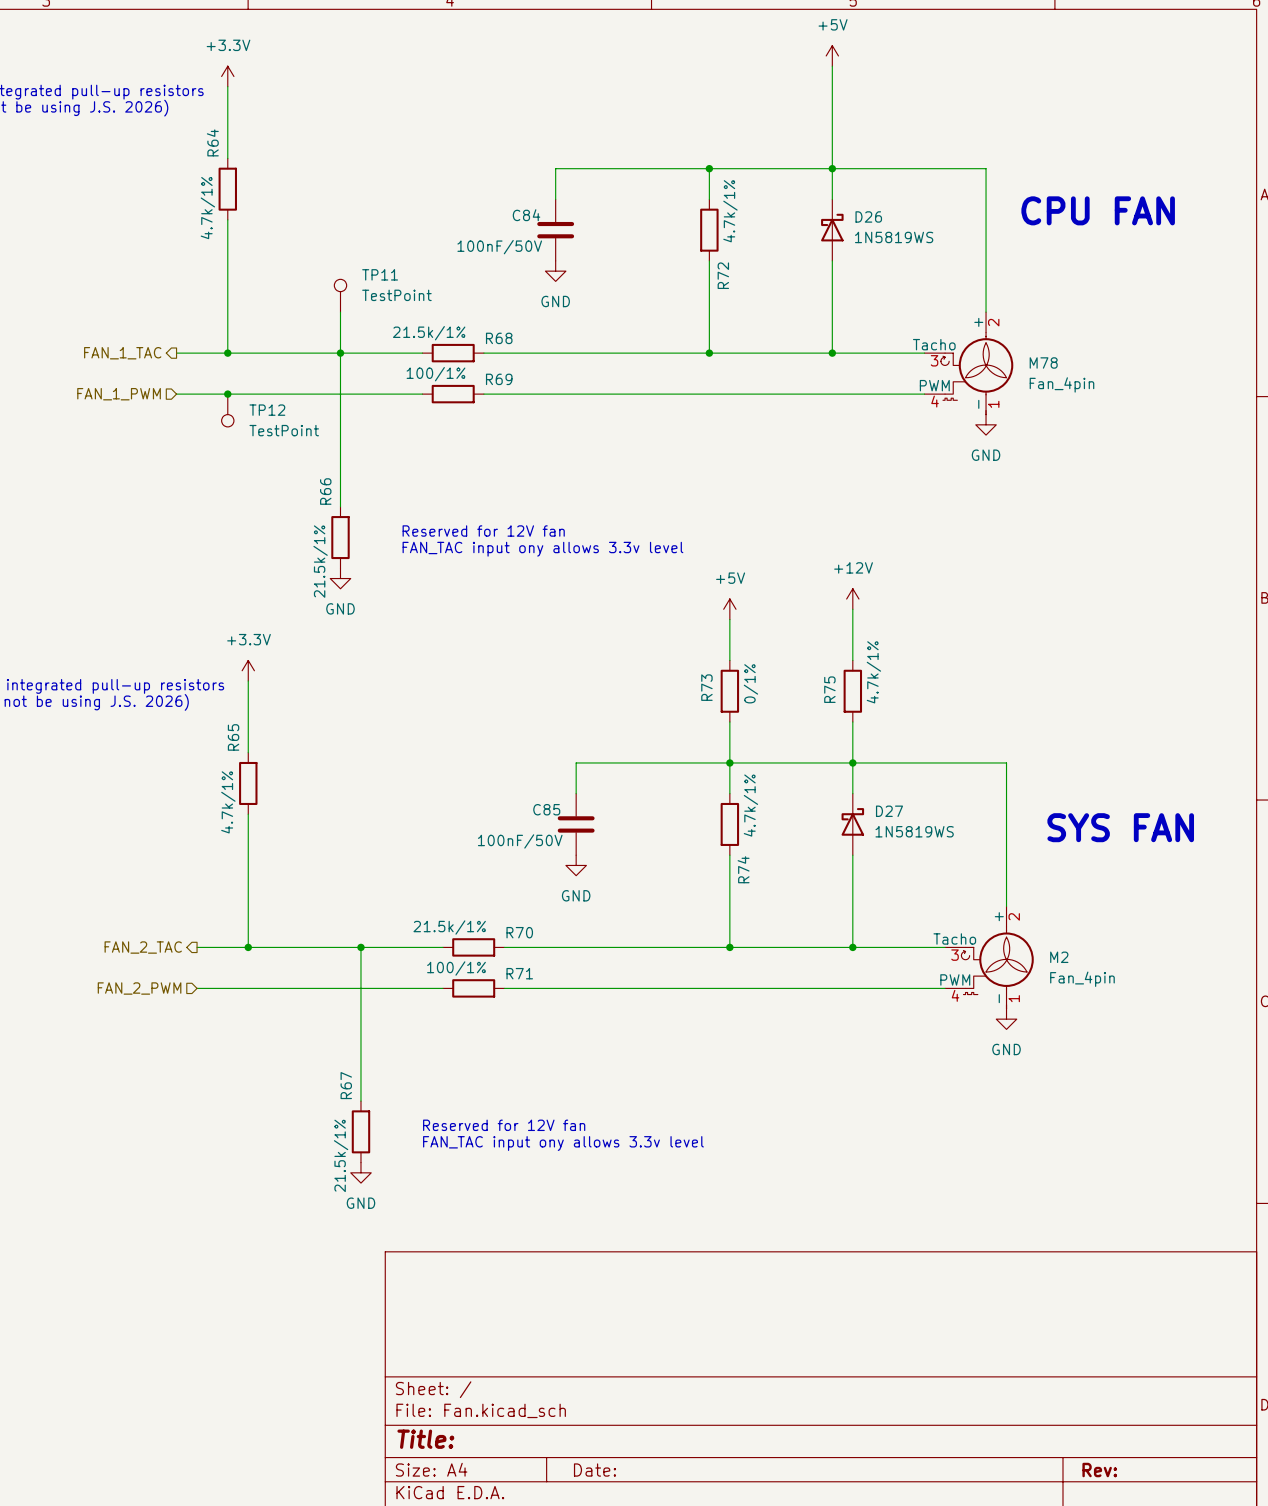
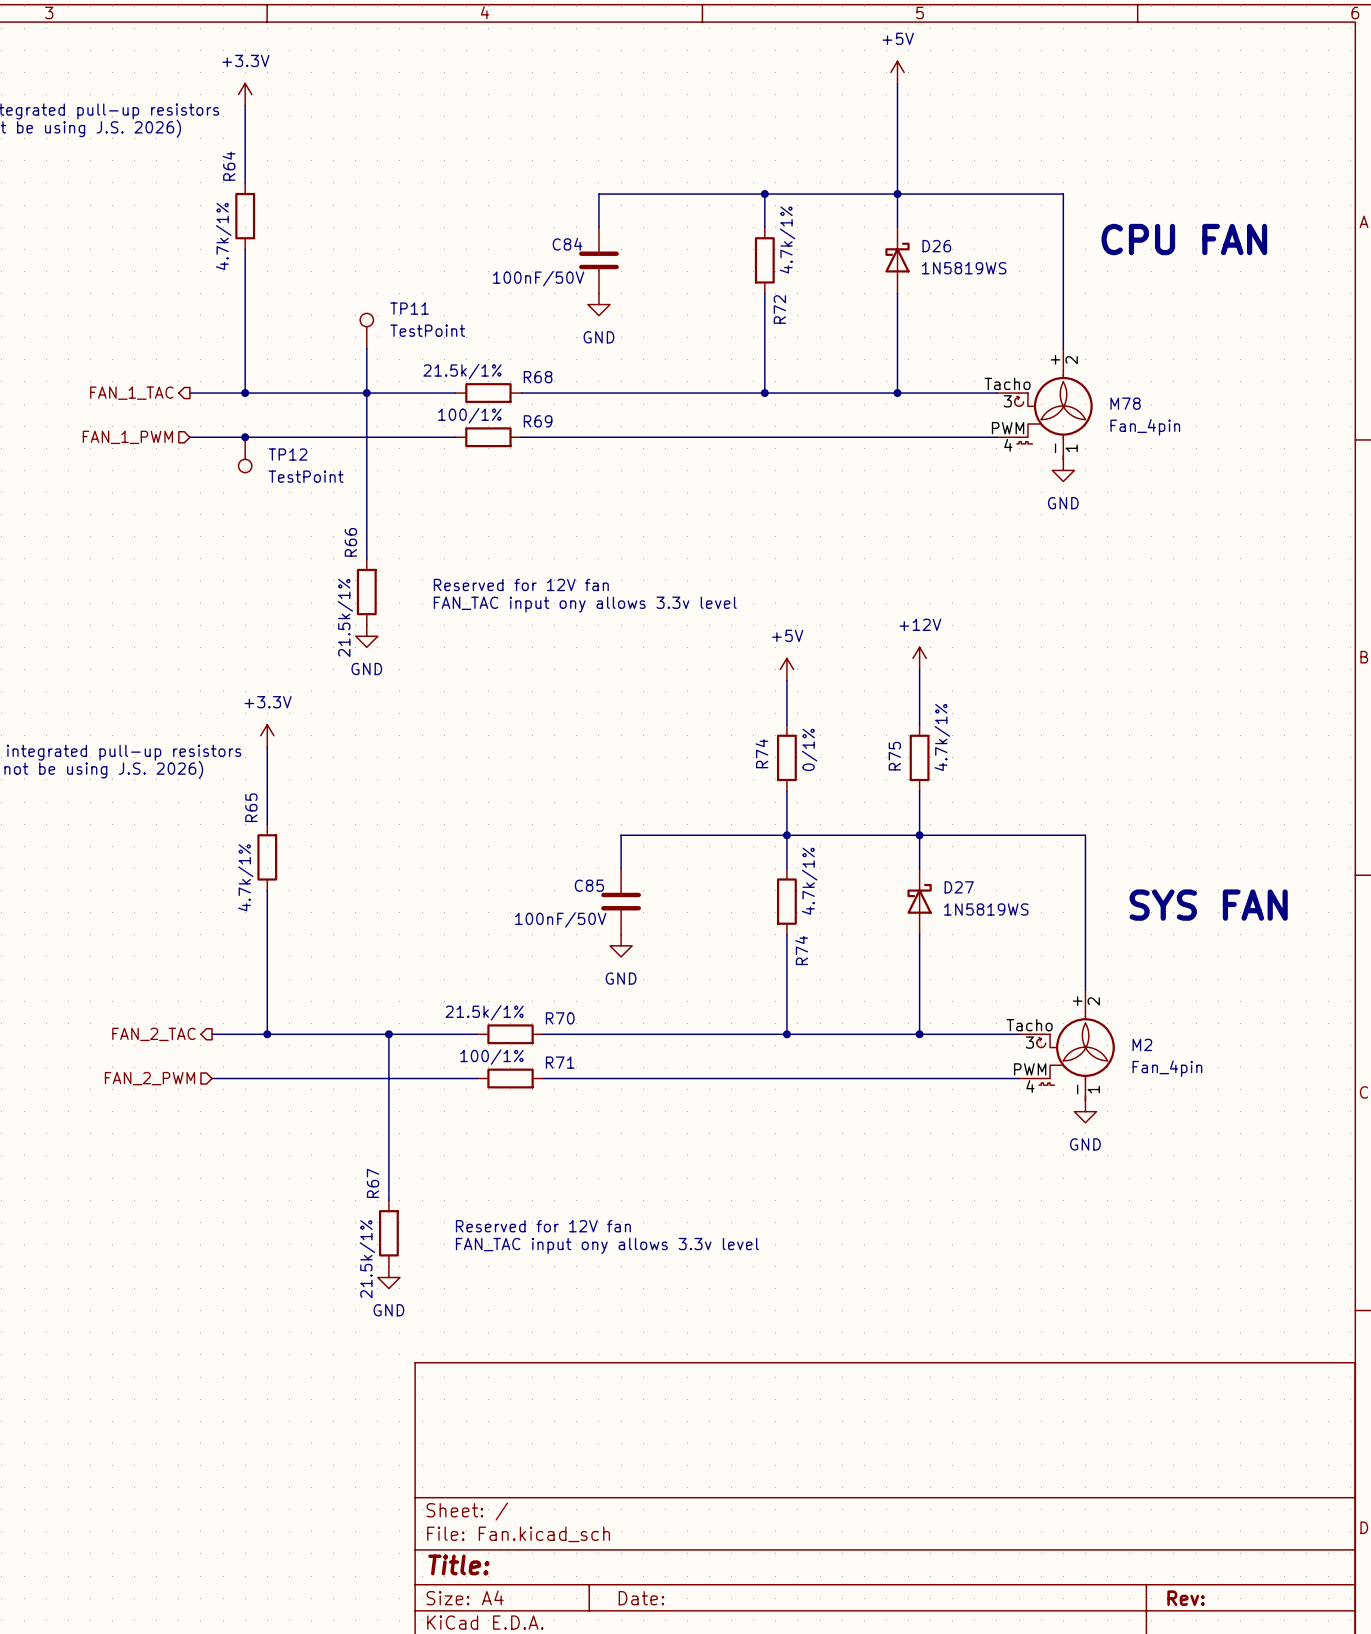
R73 name: R73 (706, 687) -> R74 (761, 753)

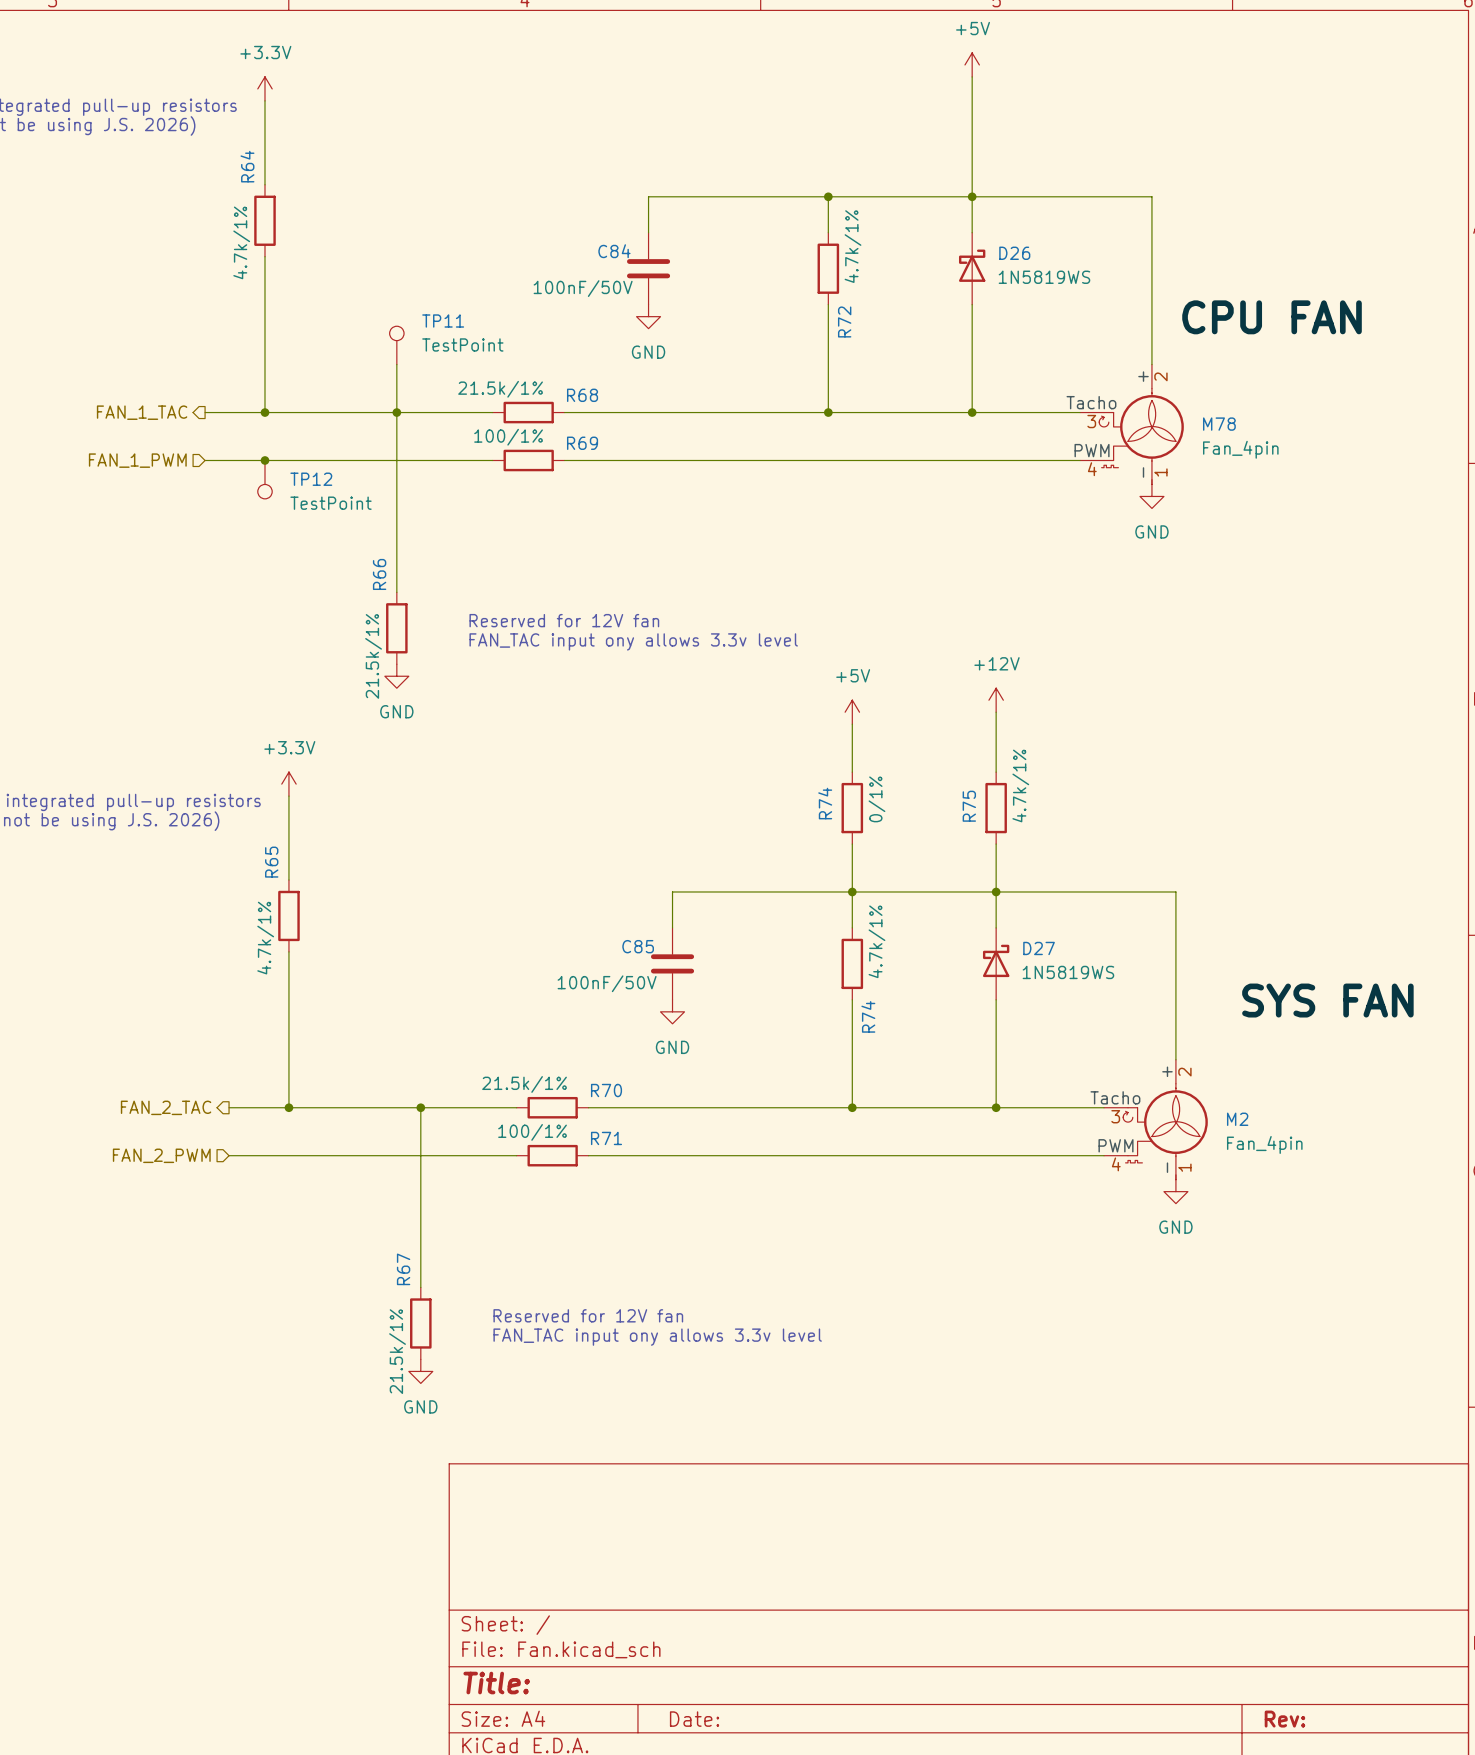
text: CPU FAN (1184, 239) -> none
label: none -> CPU FAN (1272, 317)
text: SYS FAN (1208, 905) -> none
label: none -> SYS FAN (1327, 1000)

